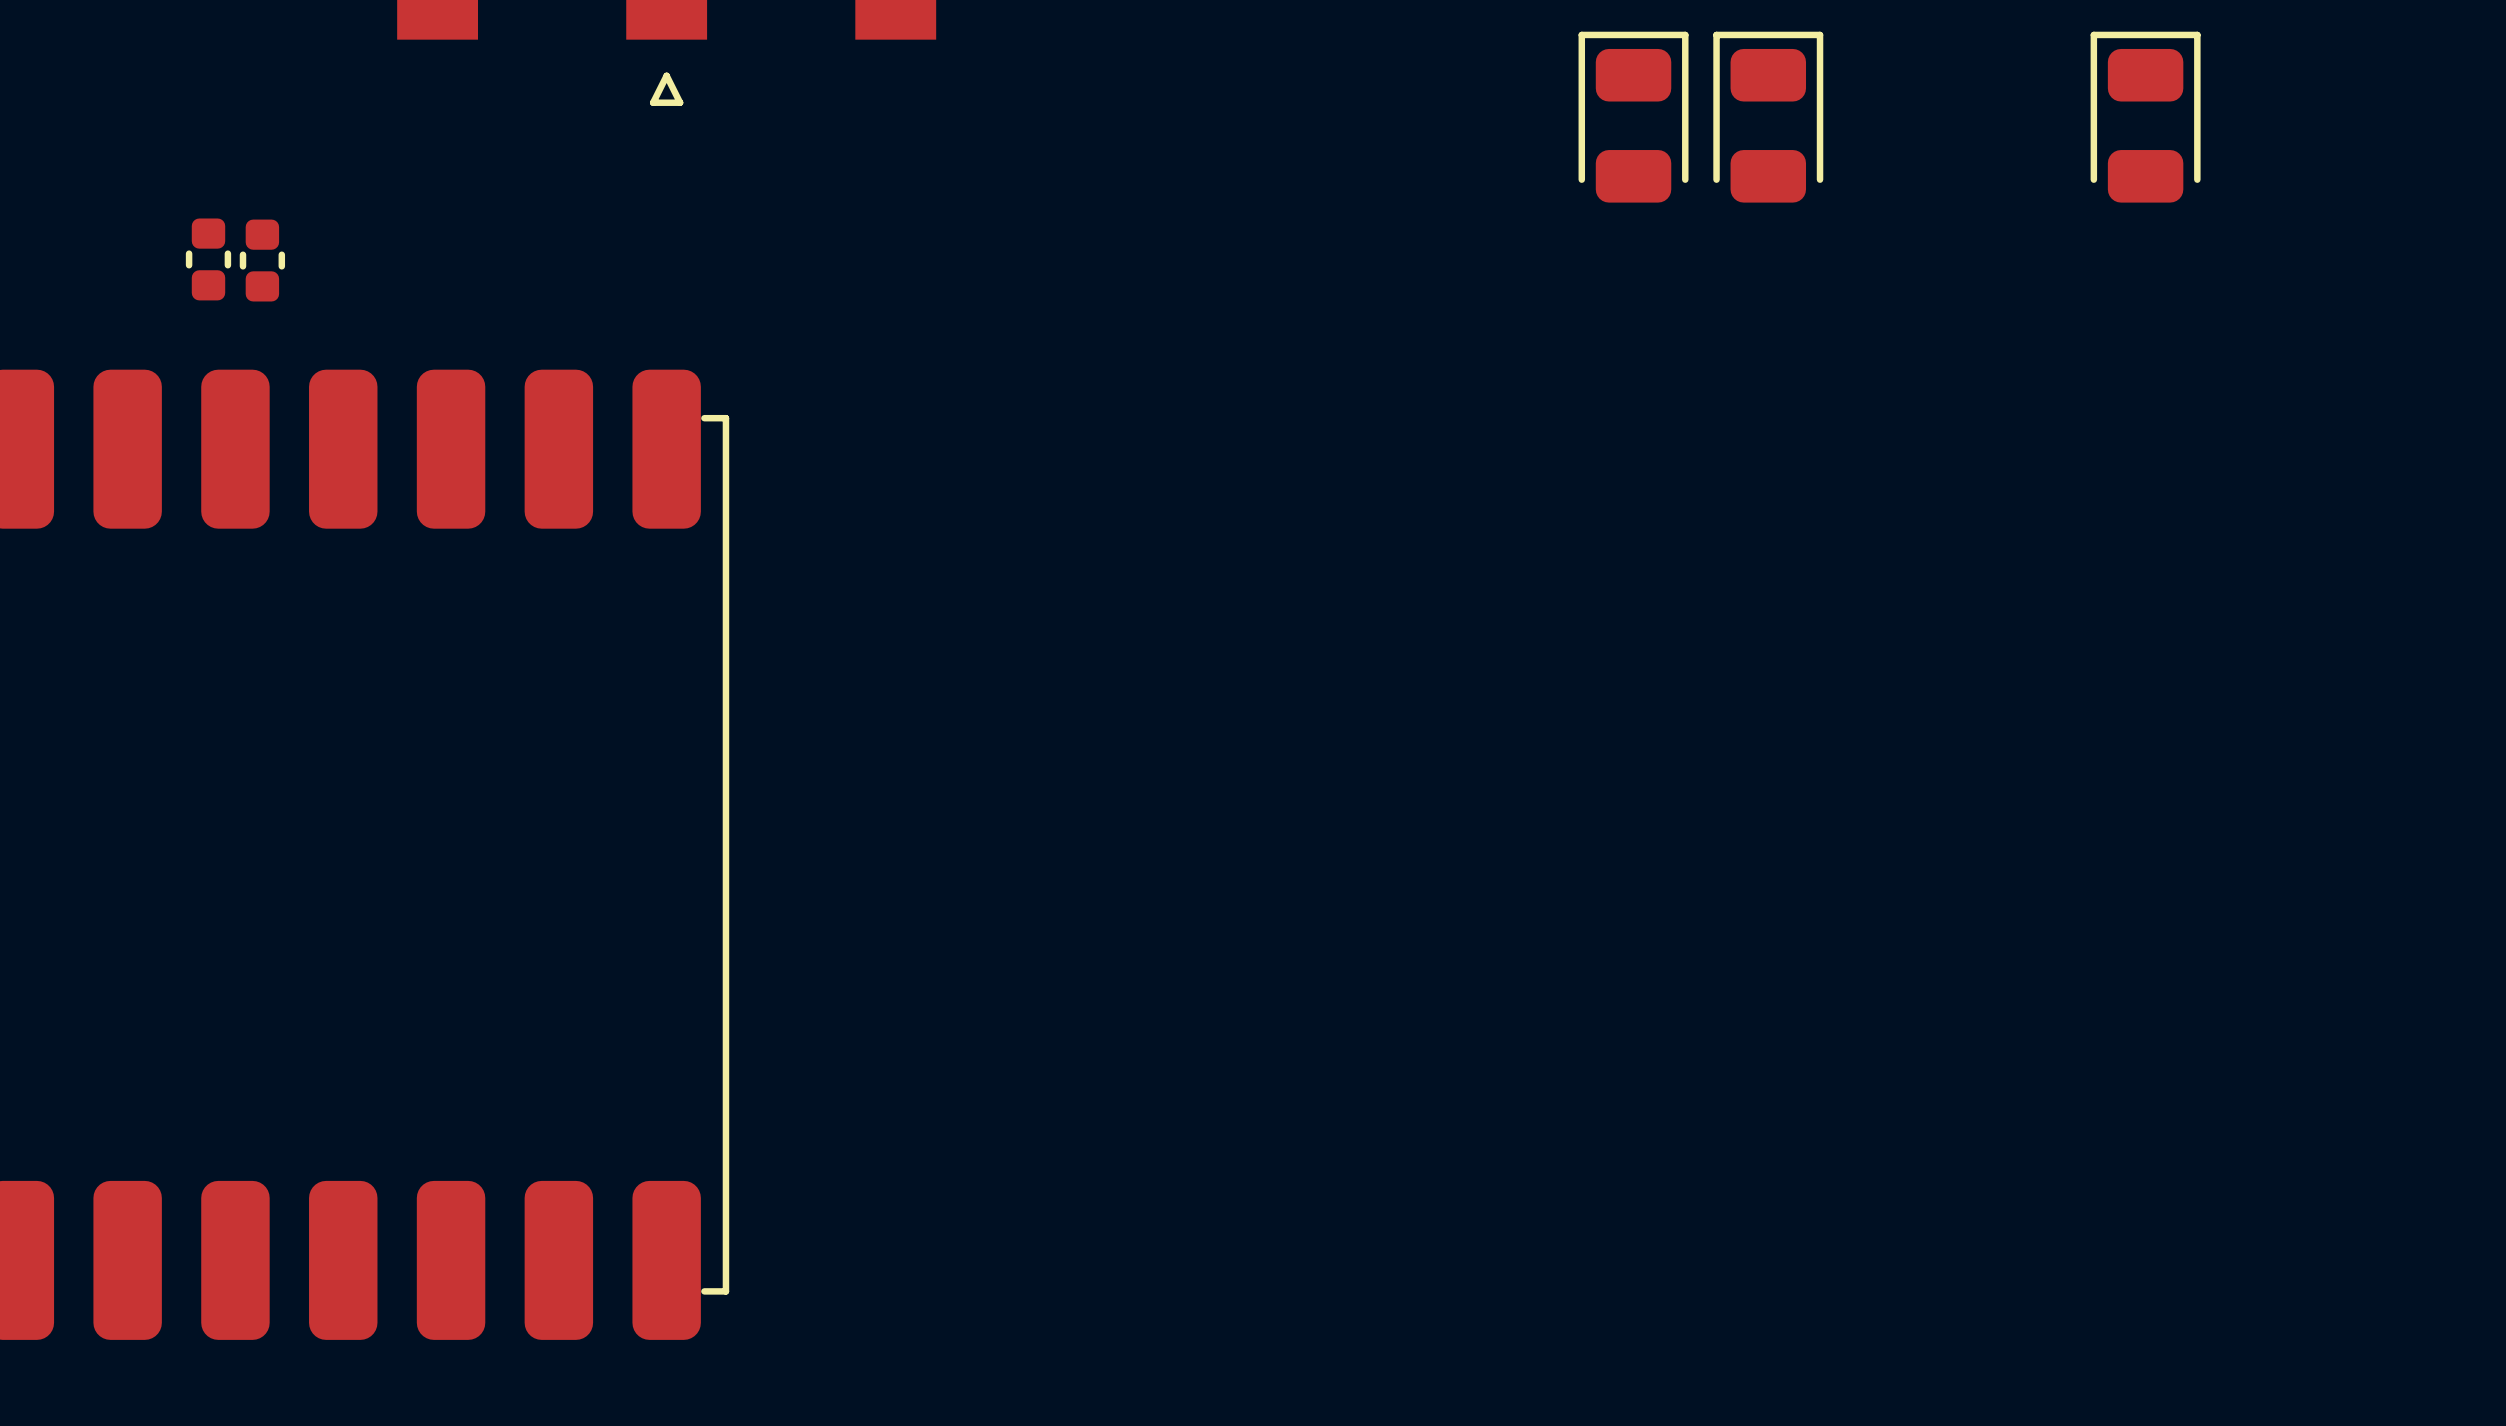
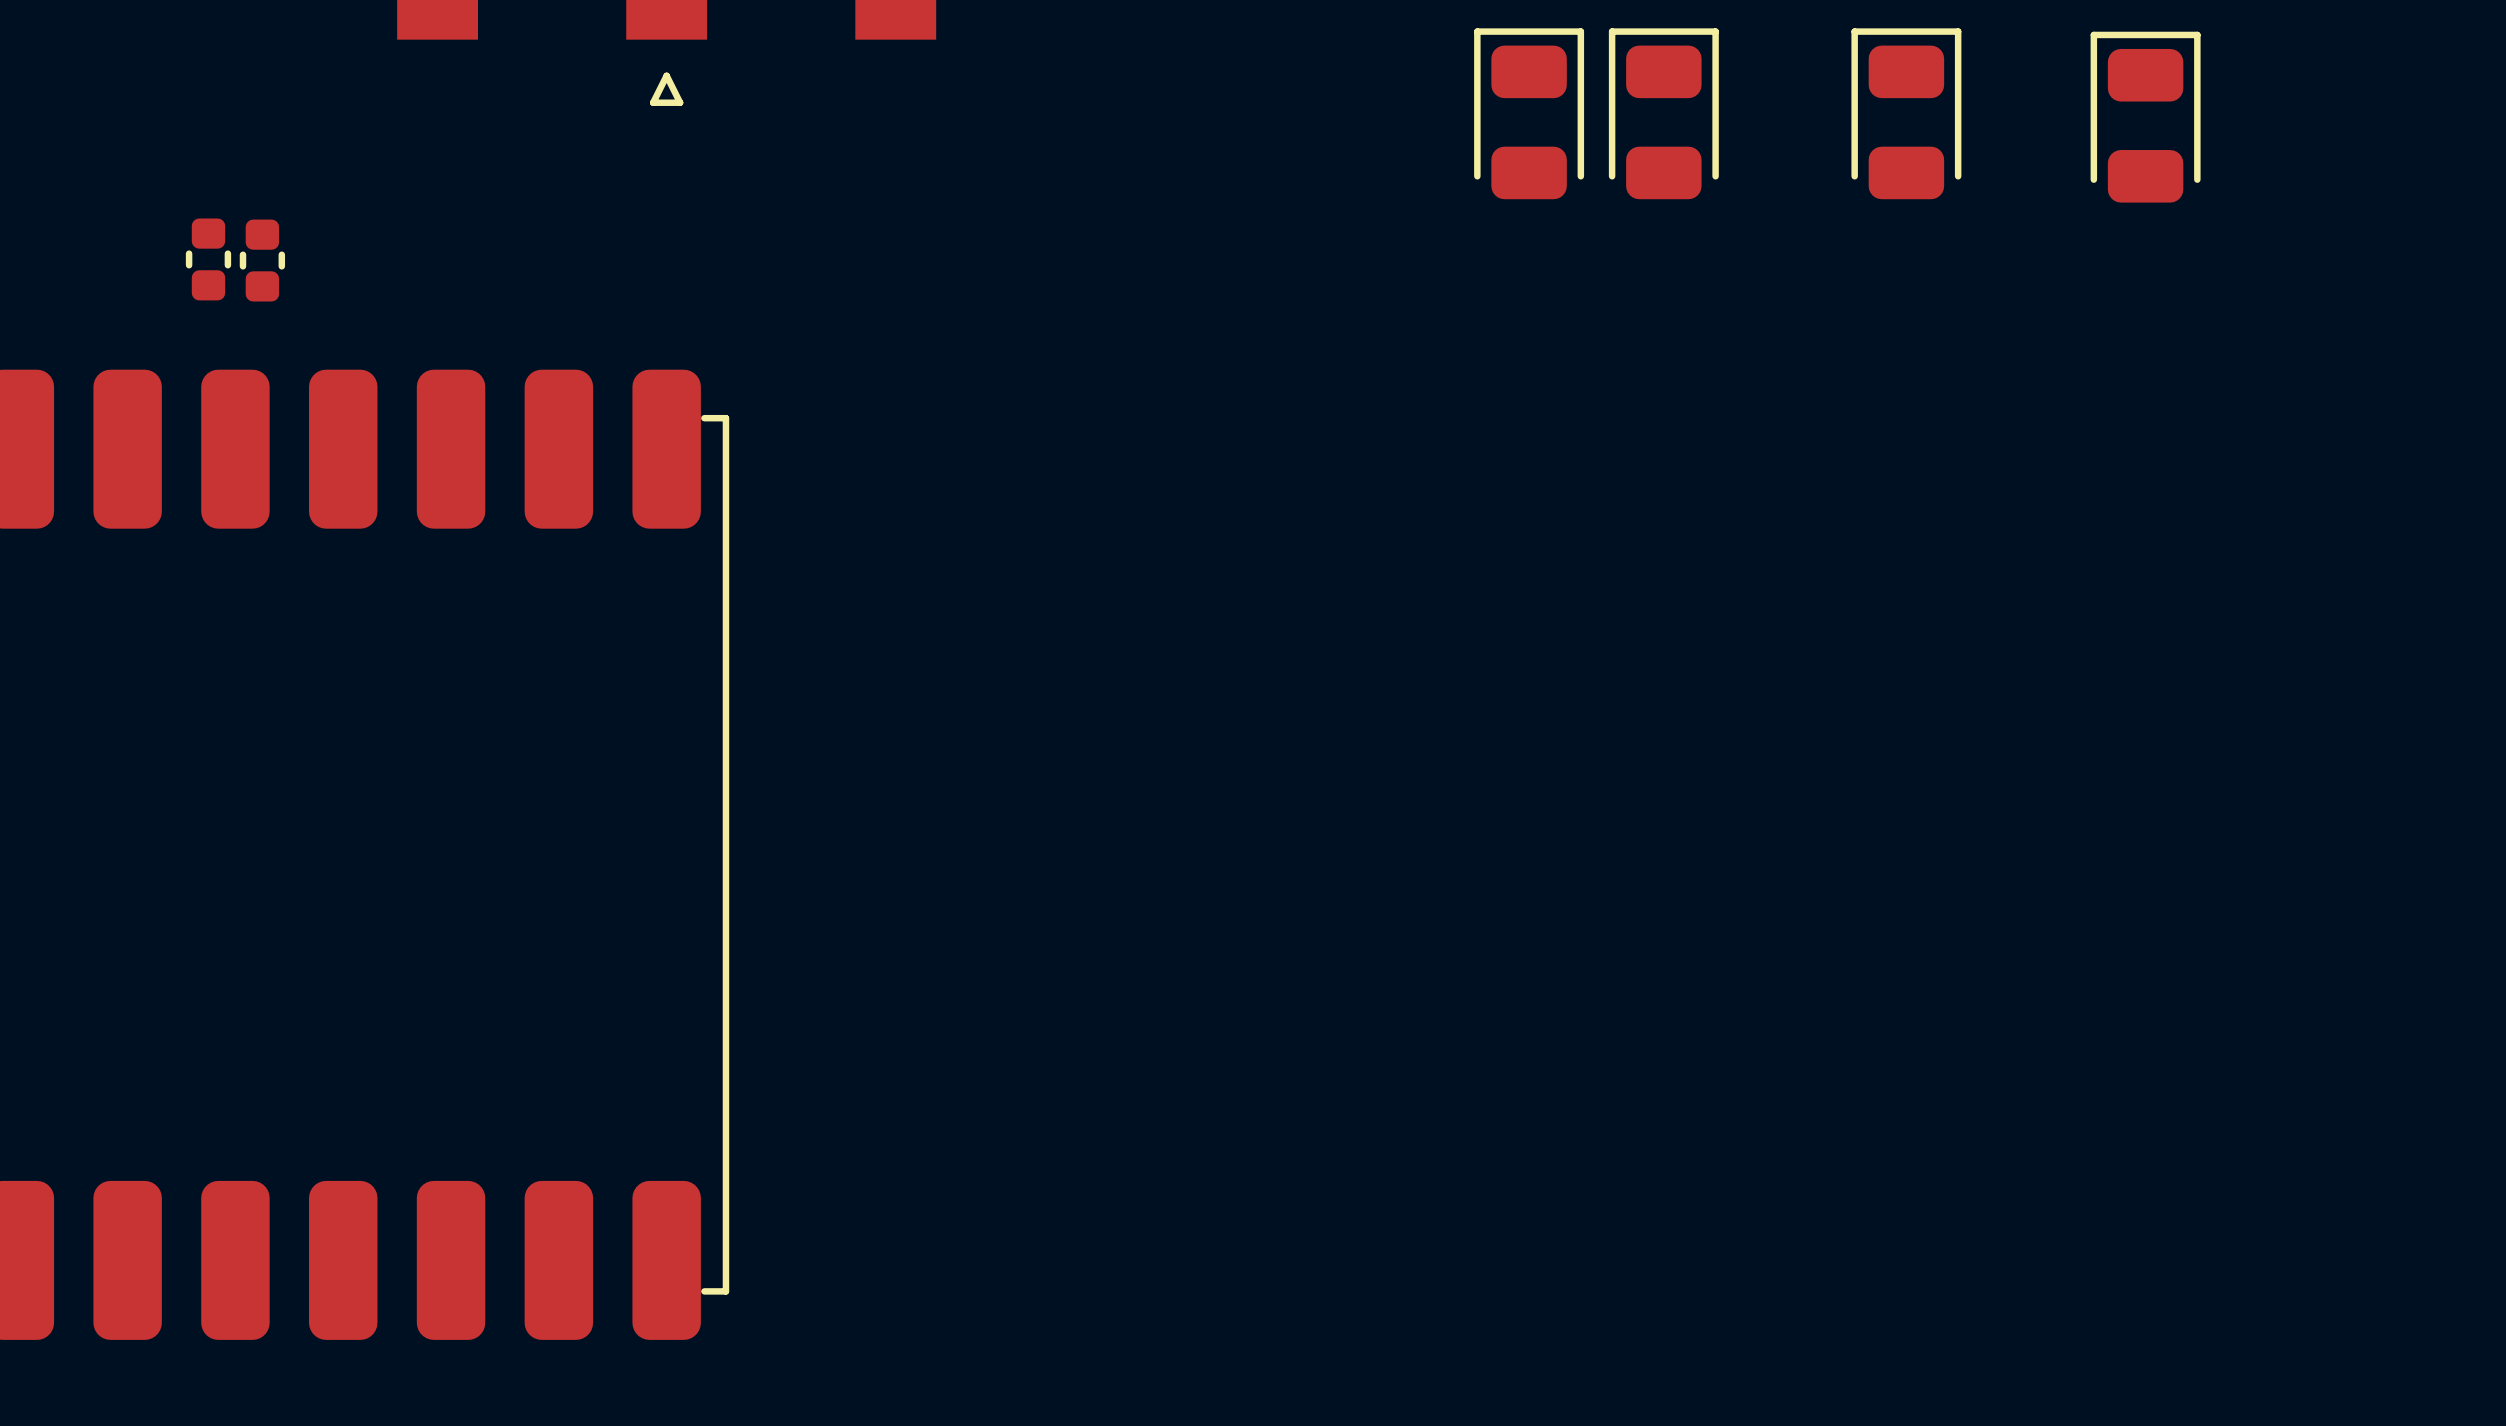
part: none -> (1529, 113)
part: none -> (1906, 113)
part position: (1633, 117) -> (1663, 113)
part: (1768, 117) -> none

